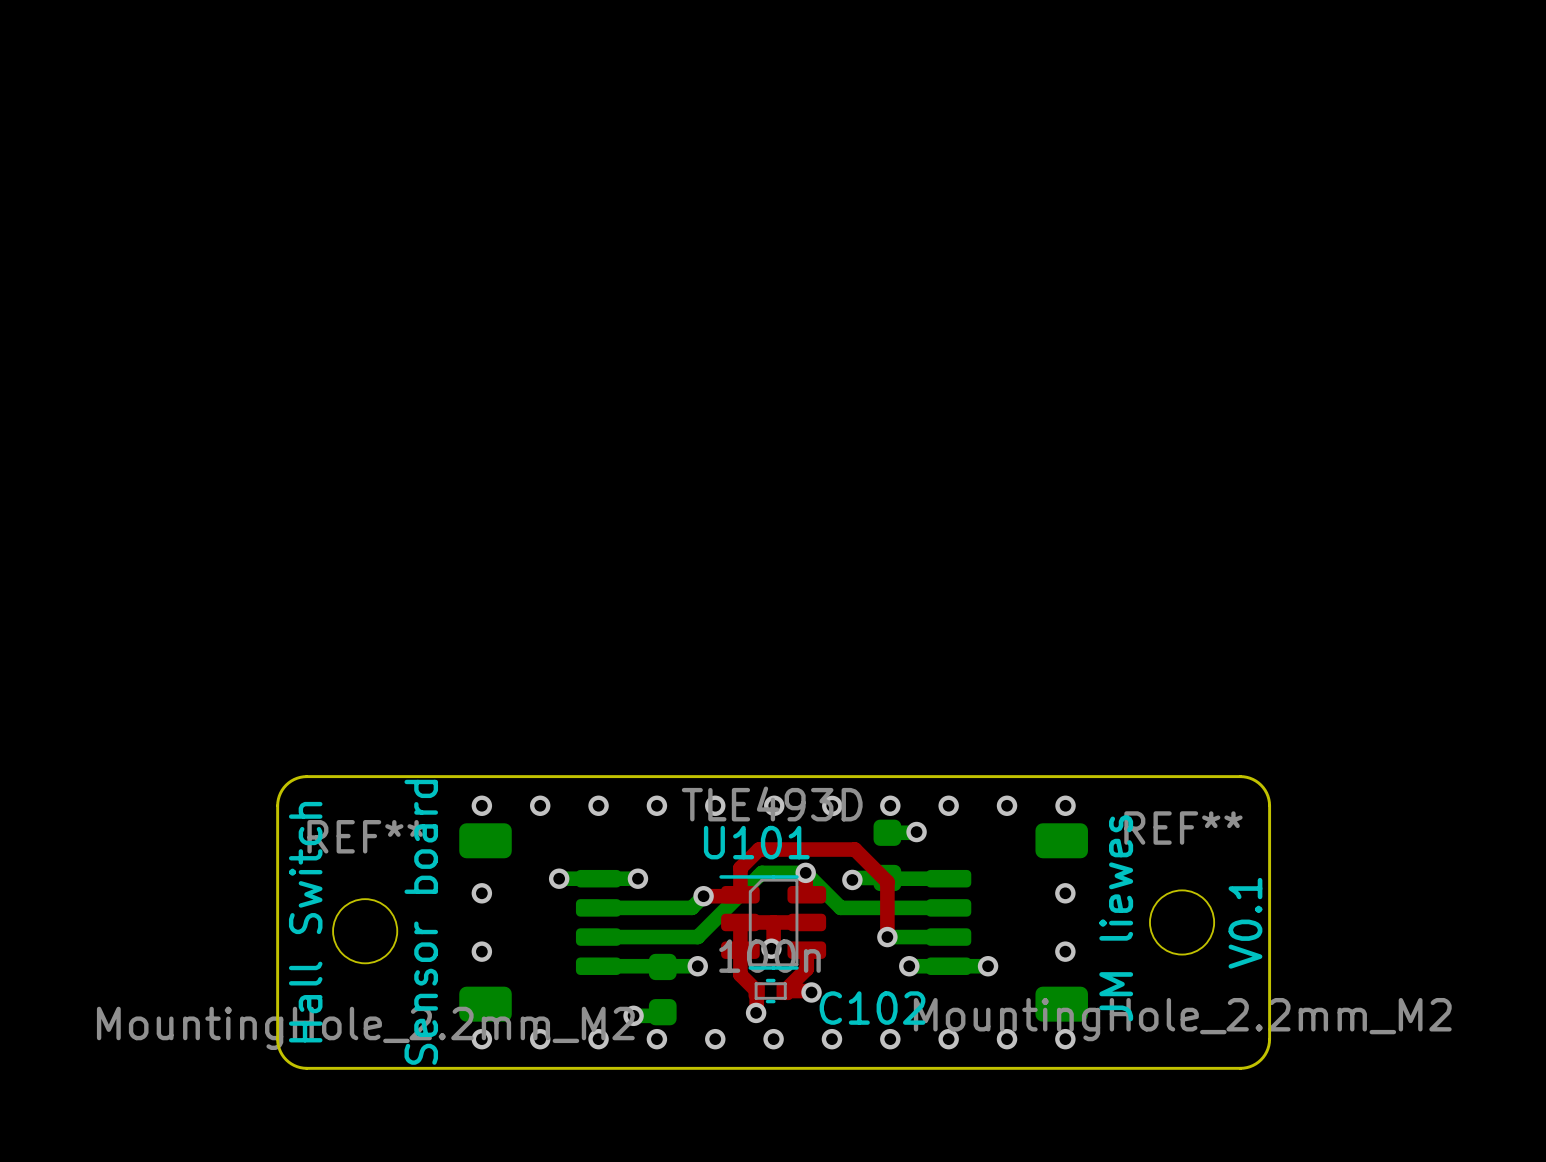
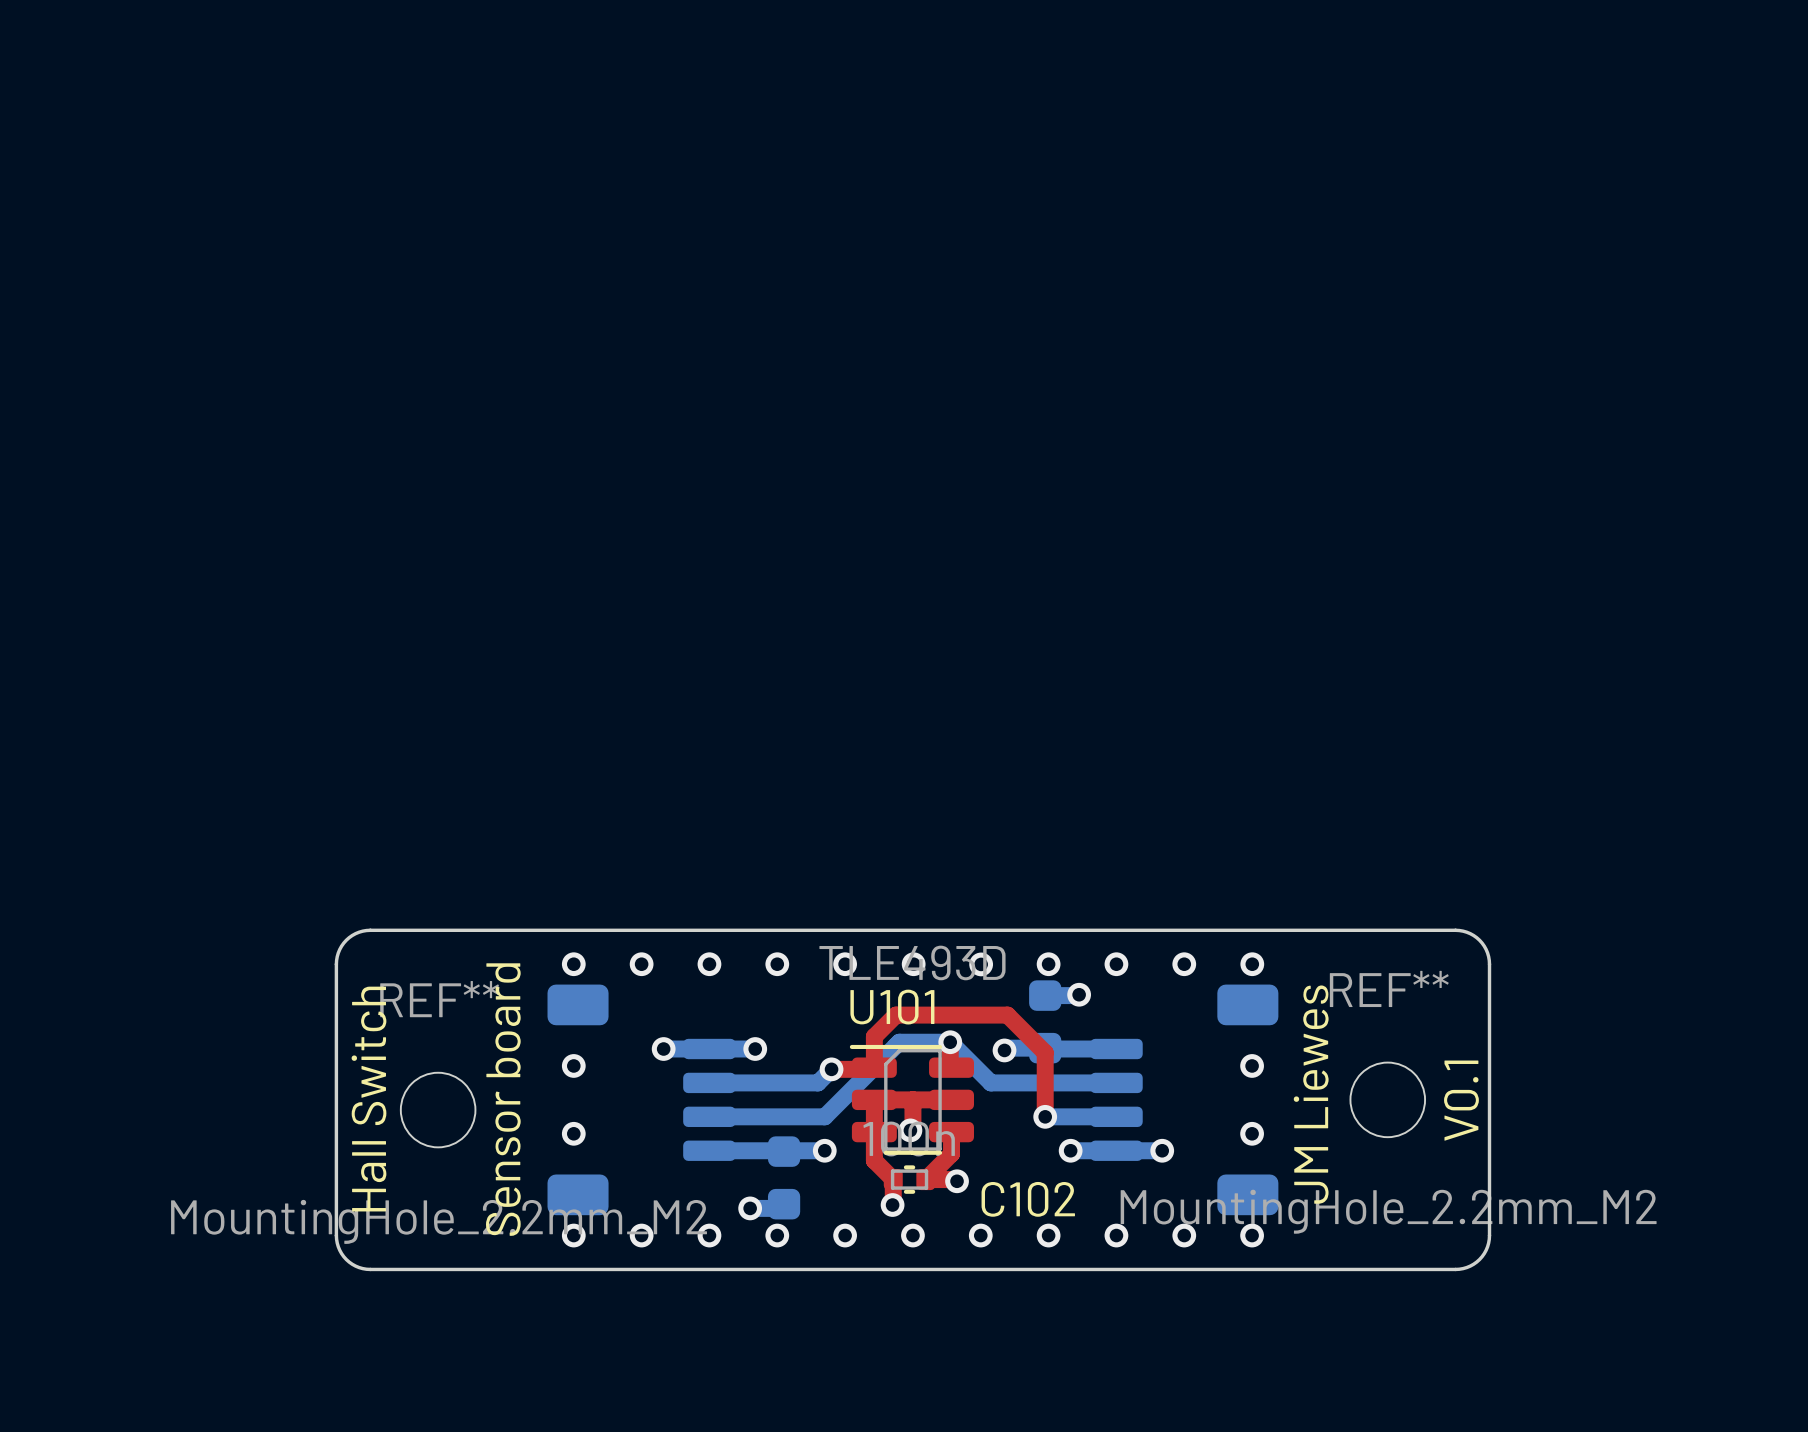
text: JM liewes (1116, 918) -> JM Liewes (1311, 1094)

